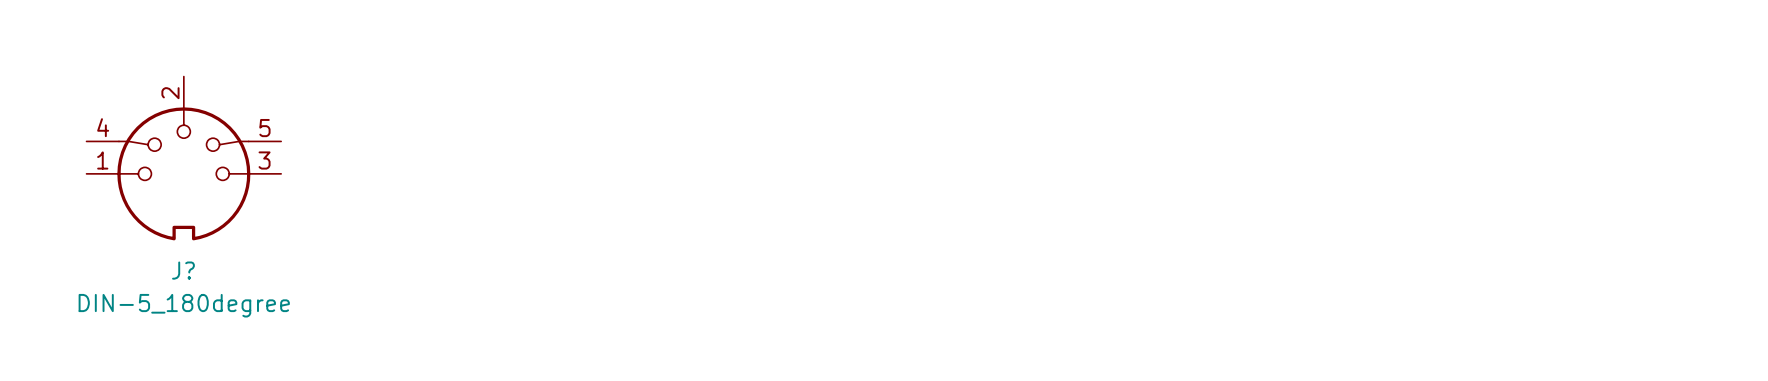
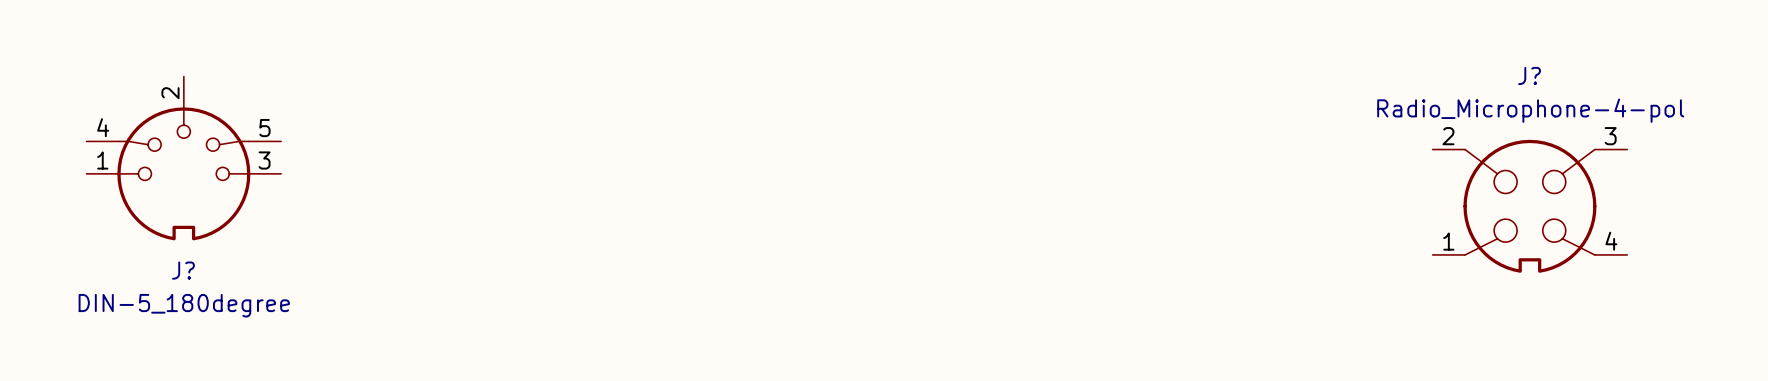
J?: none -> Radio_Microphone-4-pol (1529, 206)

